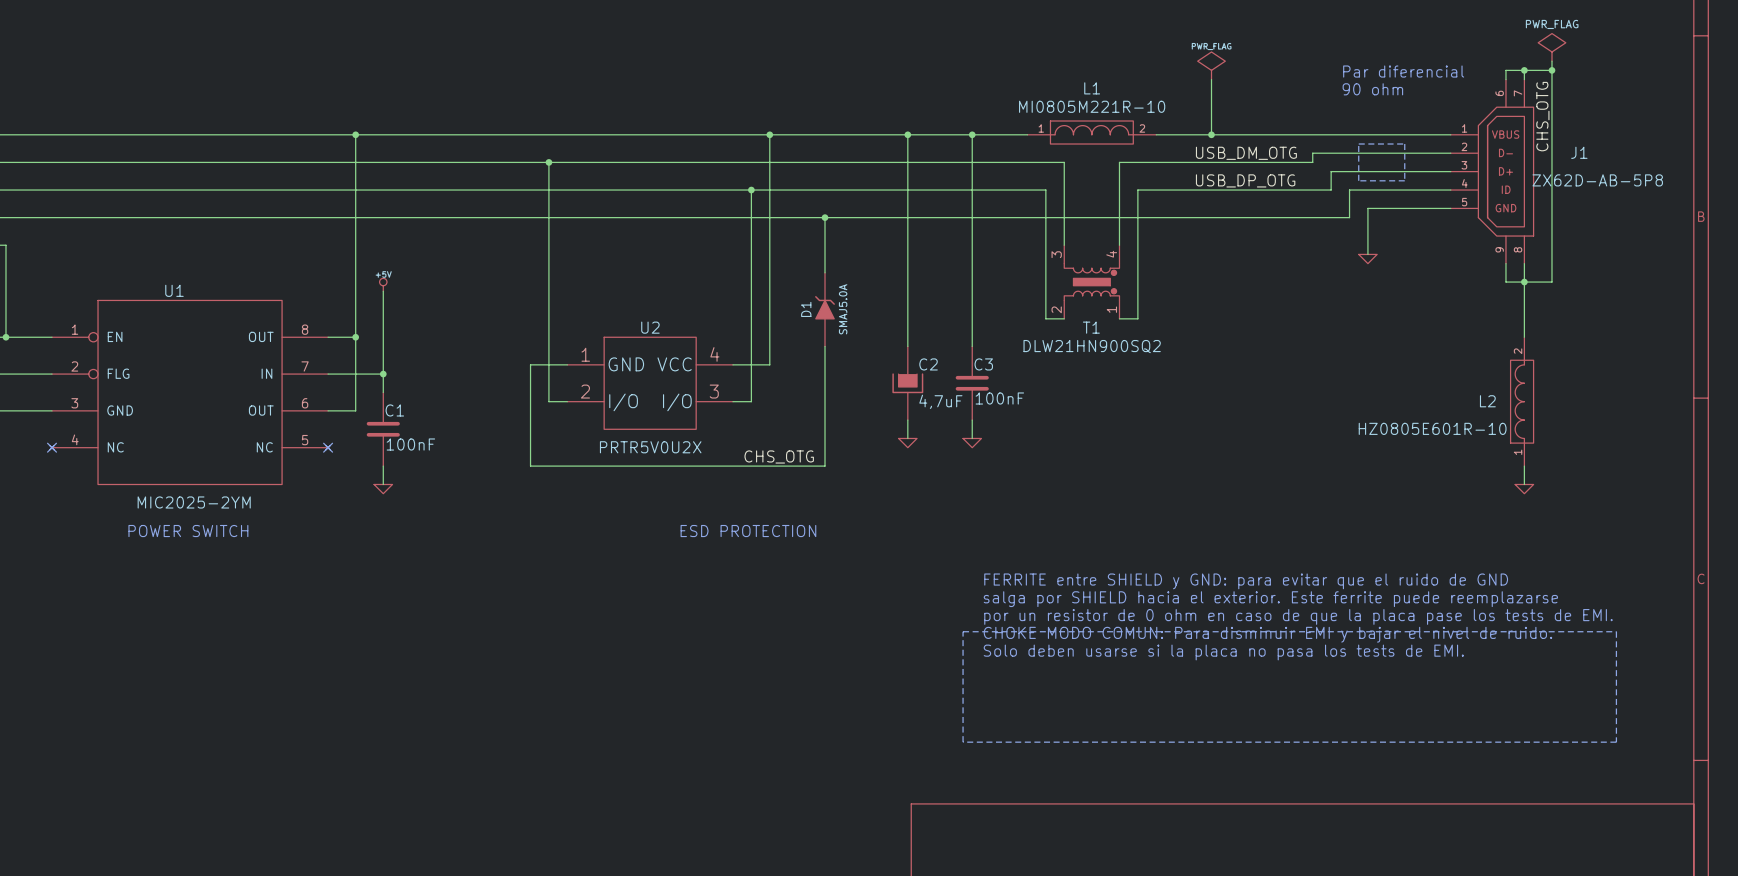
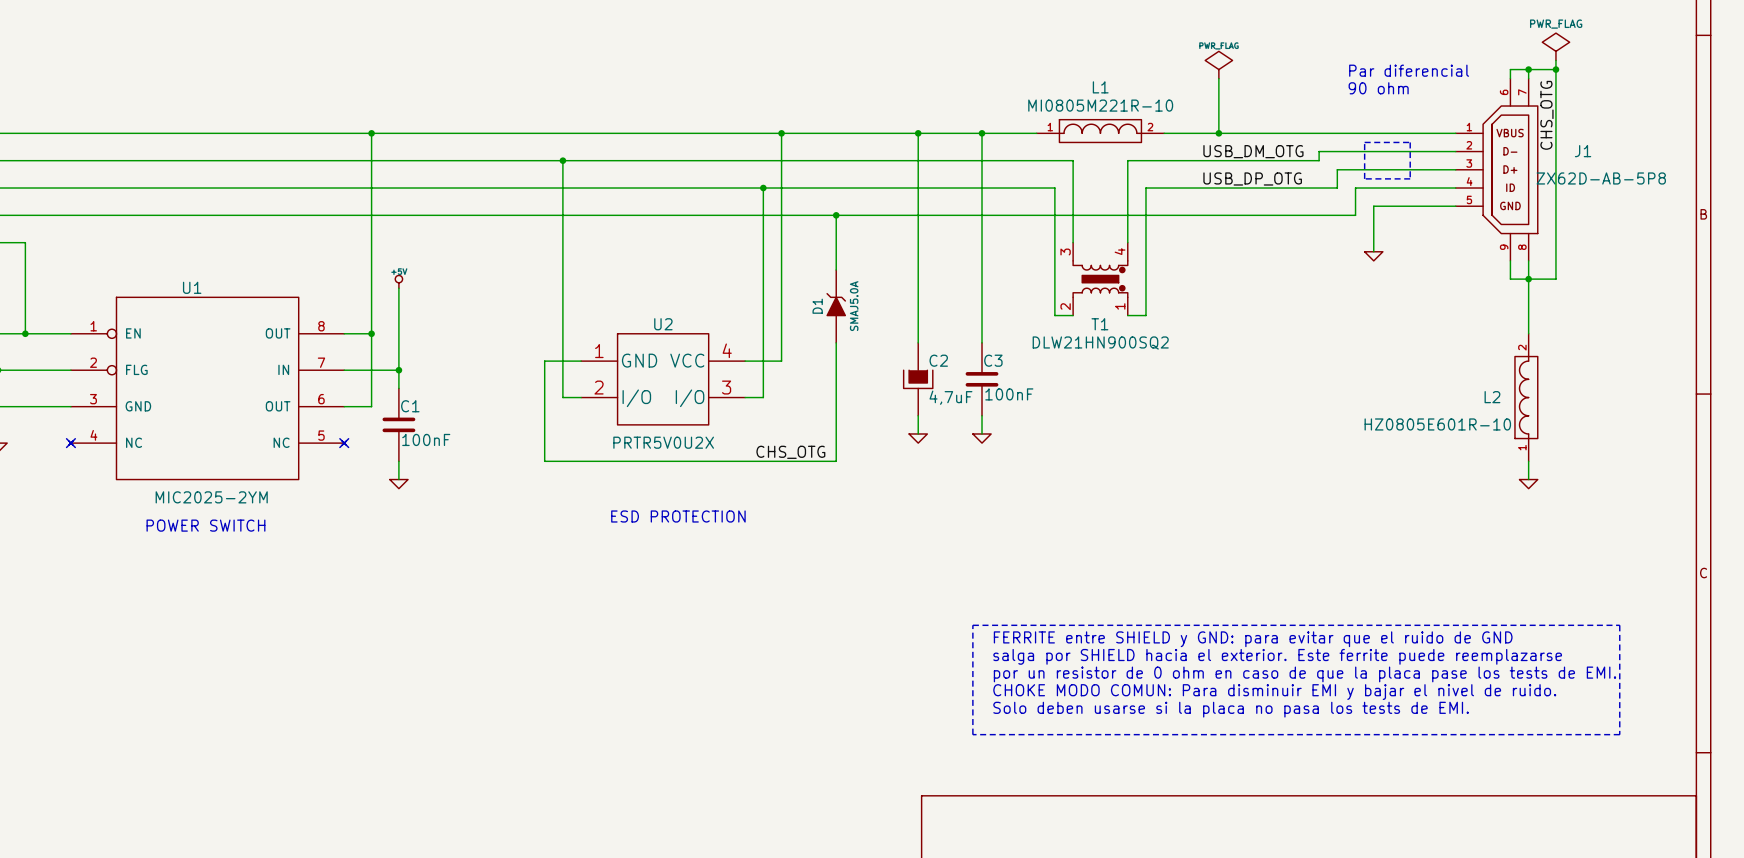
text position: ESD PROTECTION (748, 531) -> ESD PROTECTION (678, 516)
text position: FERRITE entre SHIELD y GND: para evitar que el ruido de GND (1246, 581) -> FERRITE entre SHIELD y GND: para evitar que el ruido de GND (1253, 639)
text position: salga por SHIELD hacia el exterior. Este ferrite puede reemplazarse (1270, 599) -> salga por SHIELD hacia el exterior. Este ferrite puede reemplazarse (1277, 656)
text position: por un resistor de 0 ohm en caso de que la placa pase los tests de EMI. (1298, 616) -> por un resistor de 0 ohm en caso de que la placa pase los tests de EMI. (1304, 674)
text position: CHOKE MODO COMUN: Para disminuir EMI y bajar el nivel de ruido. (1267, 634) -> CHOKE MODO COMUN: Para disminuir EMI y bajar el nivel de ruido. (1274, 692)
text position: Solo deben usarse si la placa no pasa los tests de EMI. (1223, 652) -> Solo deben usarse si la placa no pasa los tests de EMI. (1231, 709)

